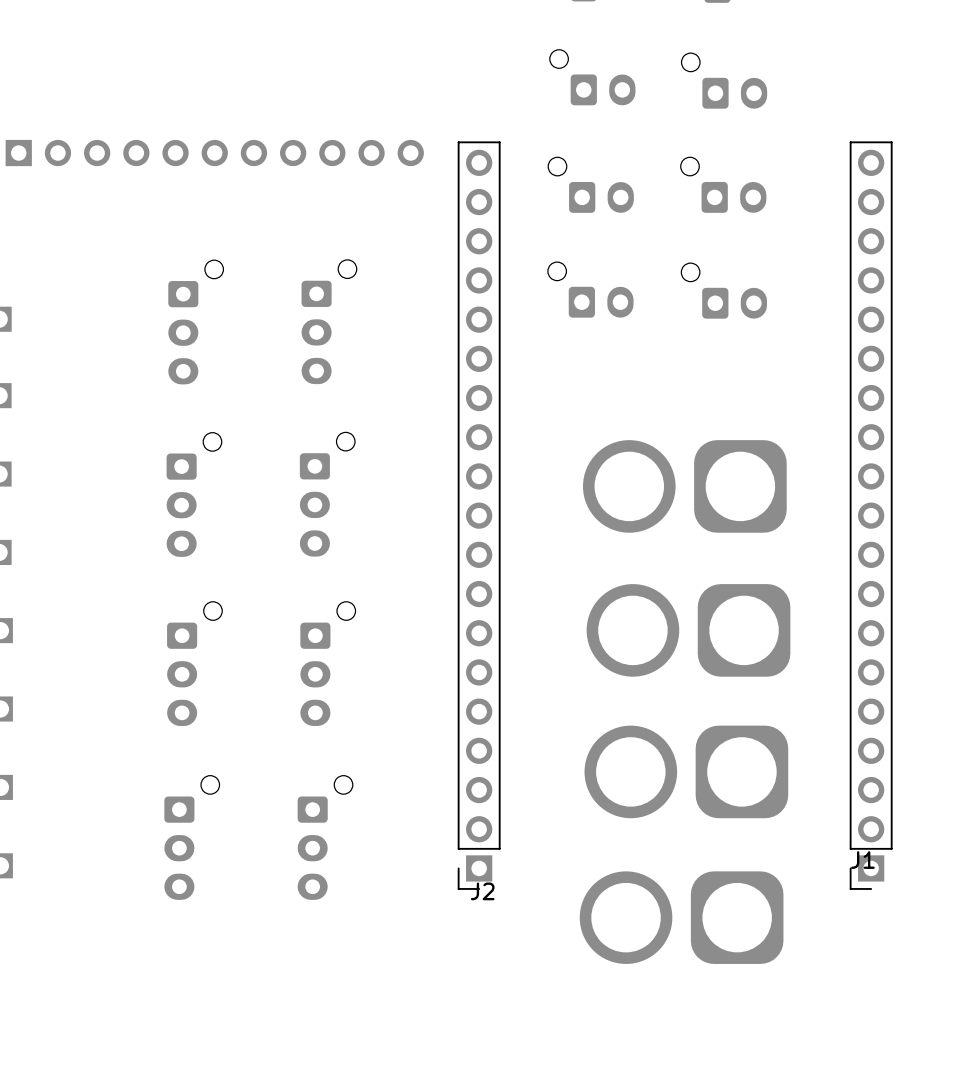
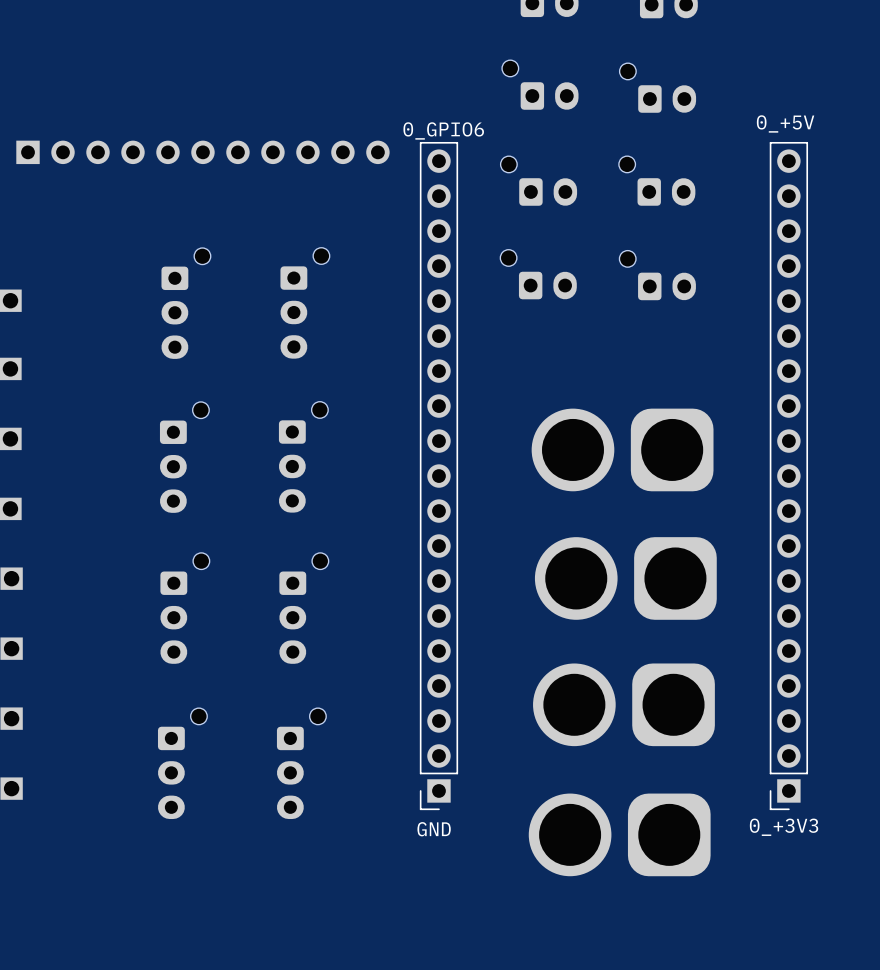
text: none -> 0_+5V (785, 123)
text: none -> 0_GPIO6 (443, 130)
J1 name: J1 (862, 860) -> none
J2 name: J2 (482, 891) -> none
text: none -> 0_+3V3 (784, 827)
text: none -> GND (434, 829)

